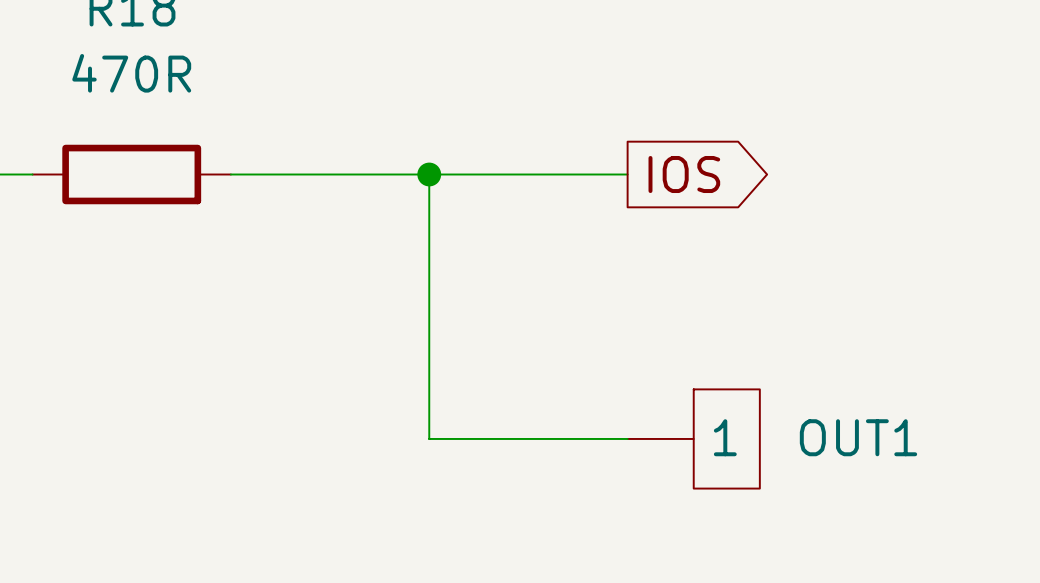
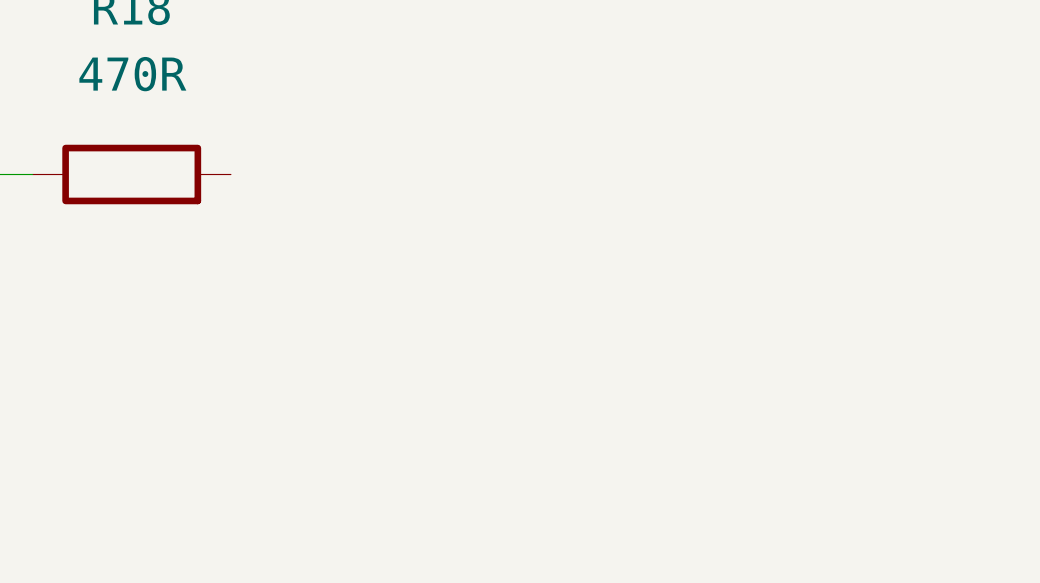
wire: (230, 174) (627, 174) -> none
wire: (429, 174) (429, 438) (627, 438) -> none
junction: (429, 174) -> none
global label: IOS (684, 174) -> none
OUT1: (693, 438) -> none

